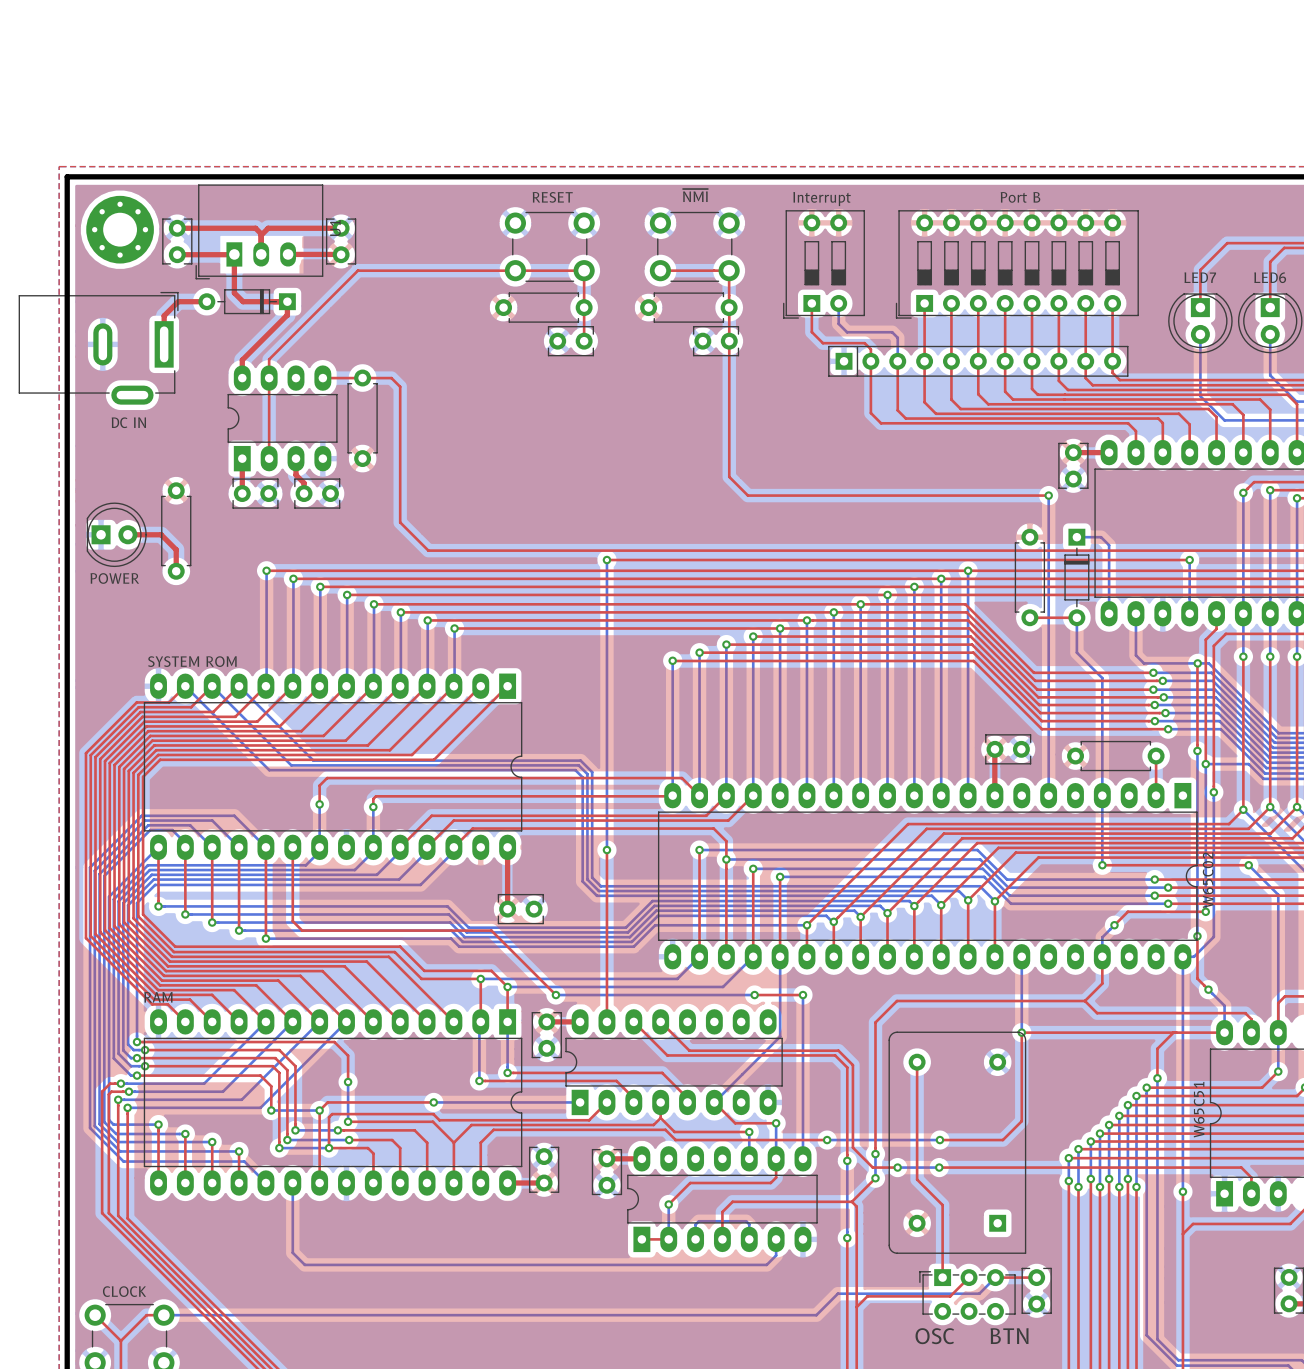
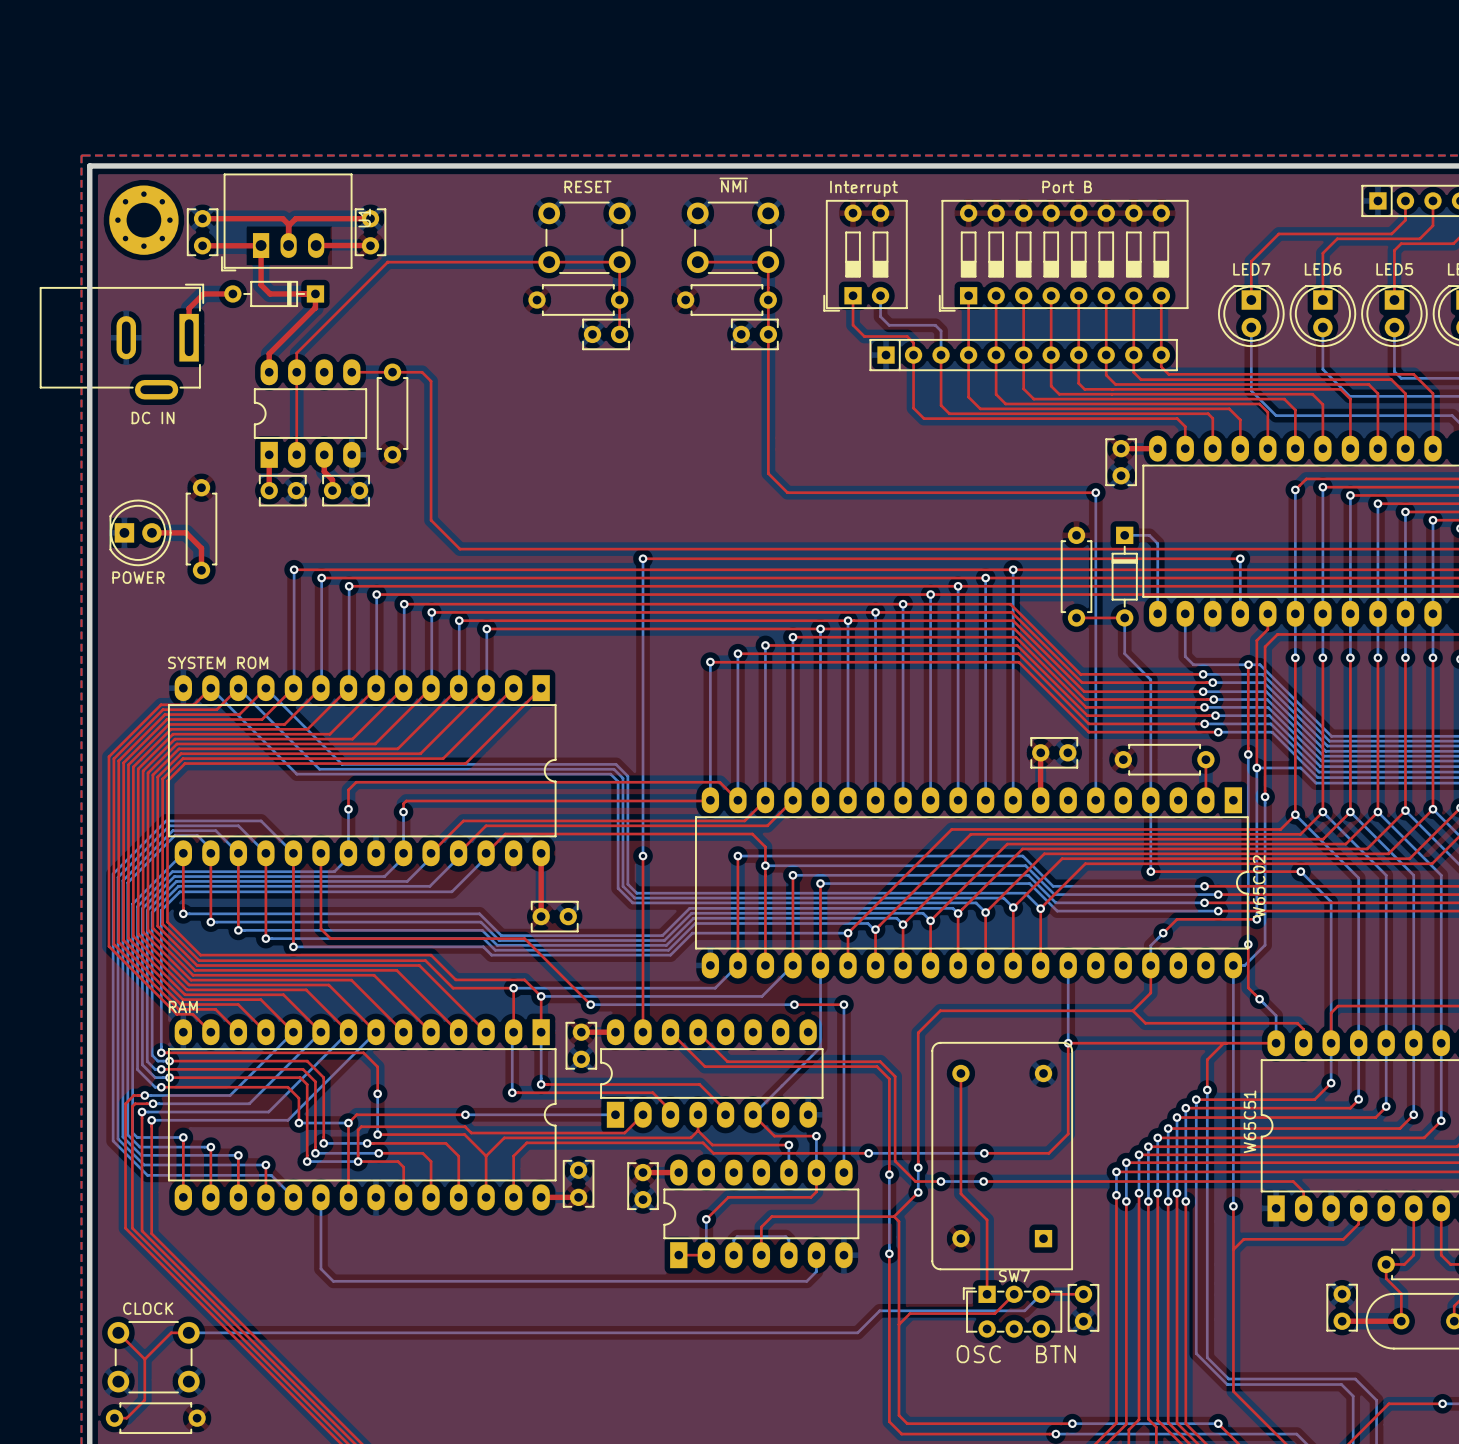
SW7 name: none -> SW7 (1014, 1276)

